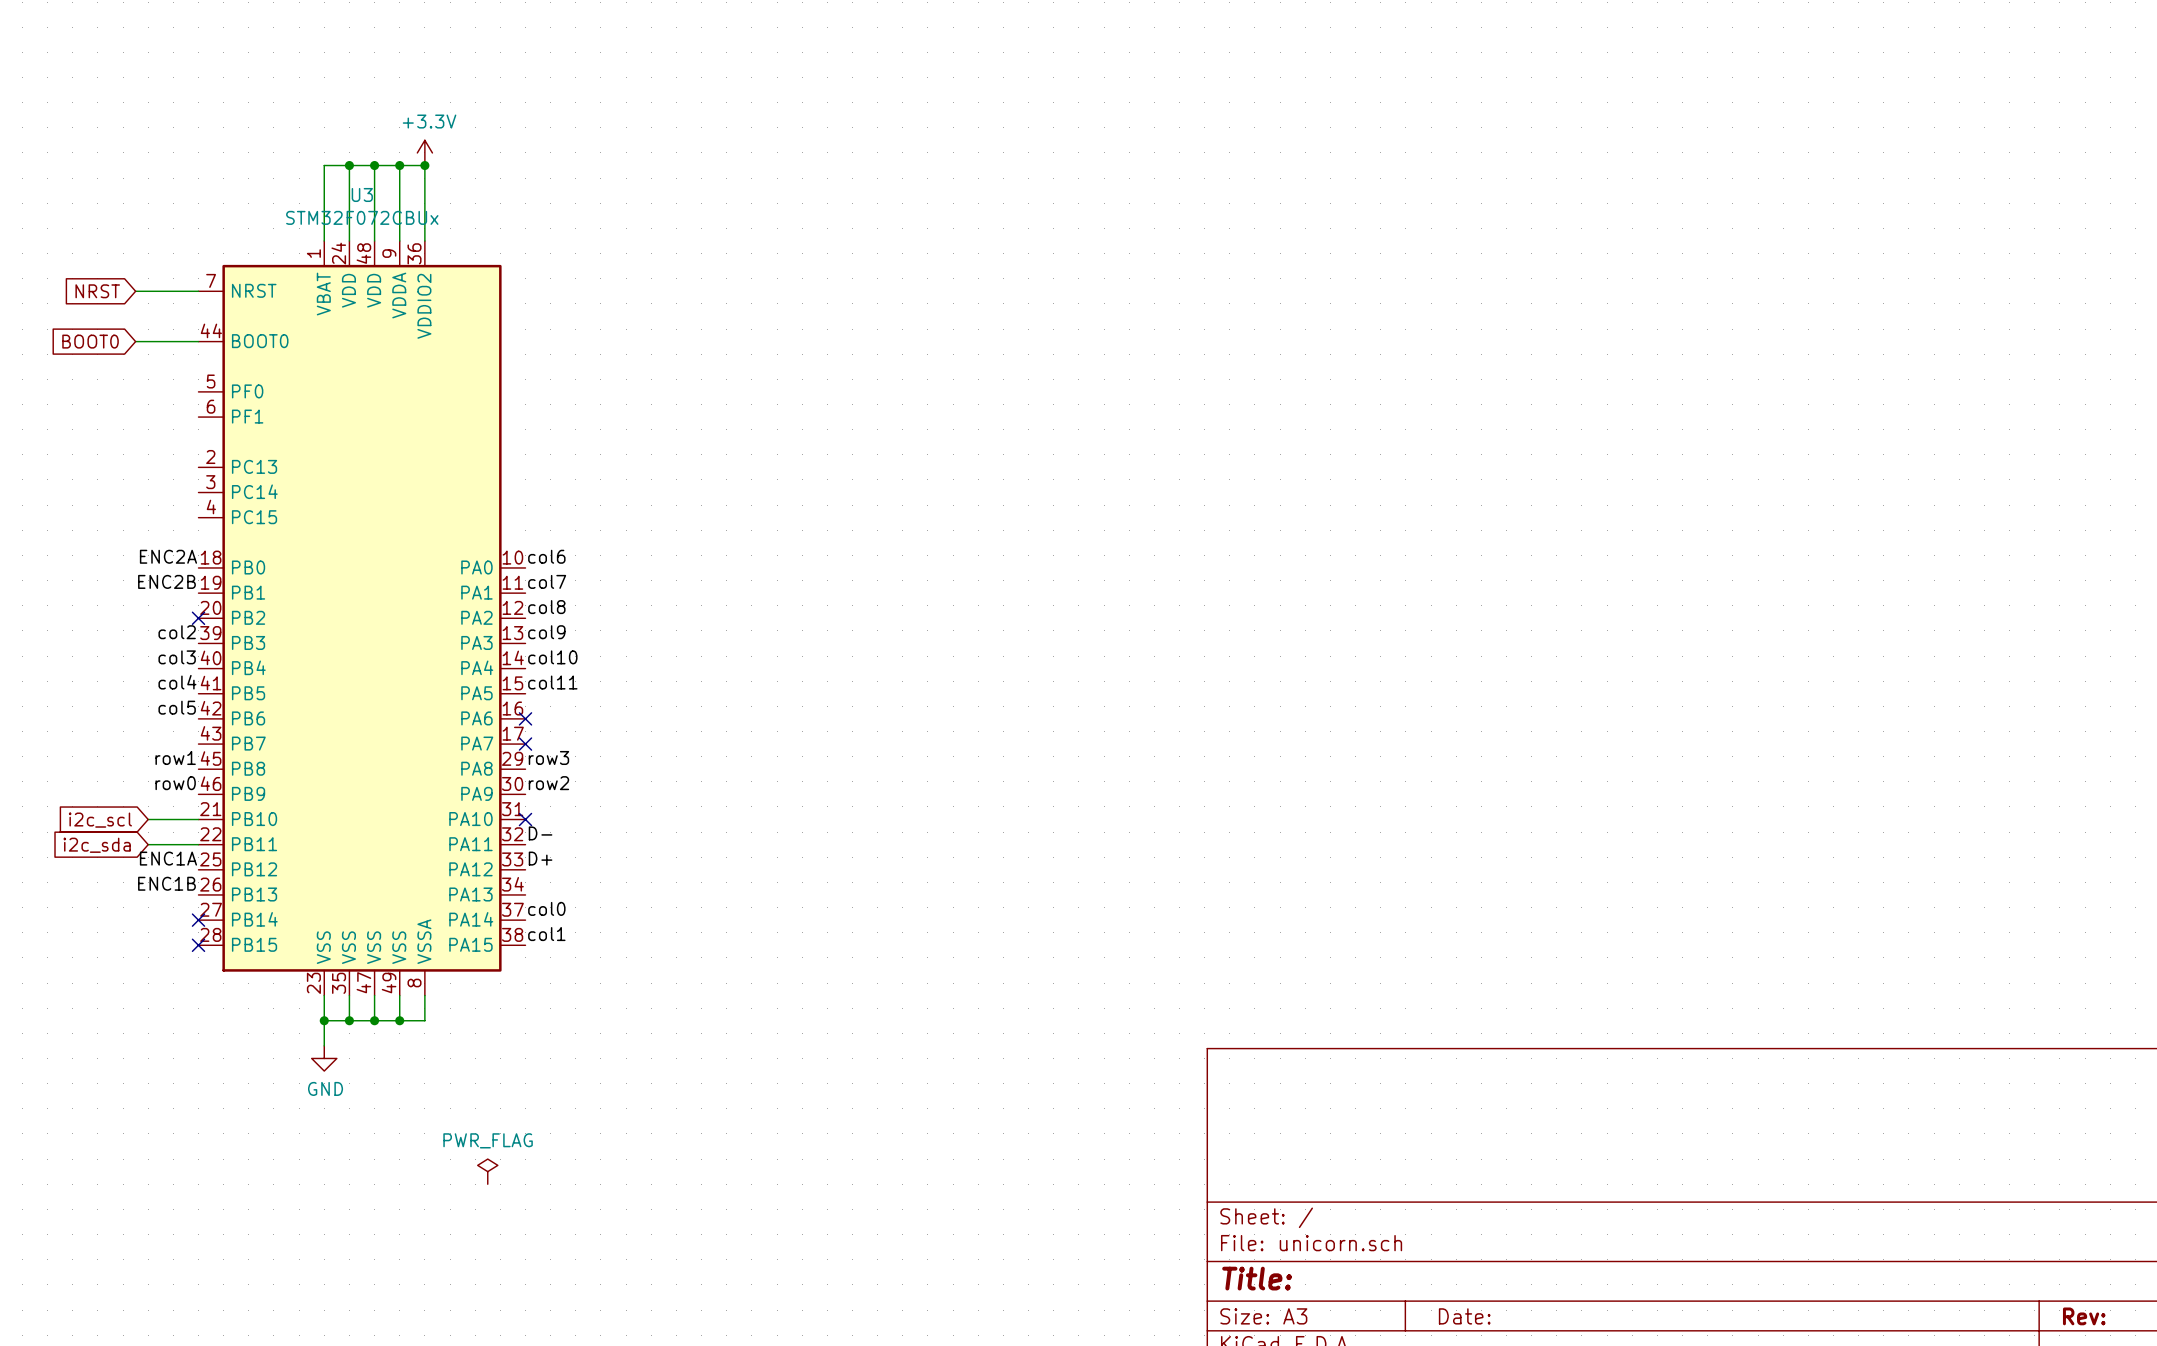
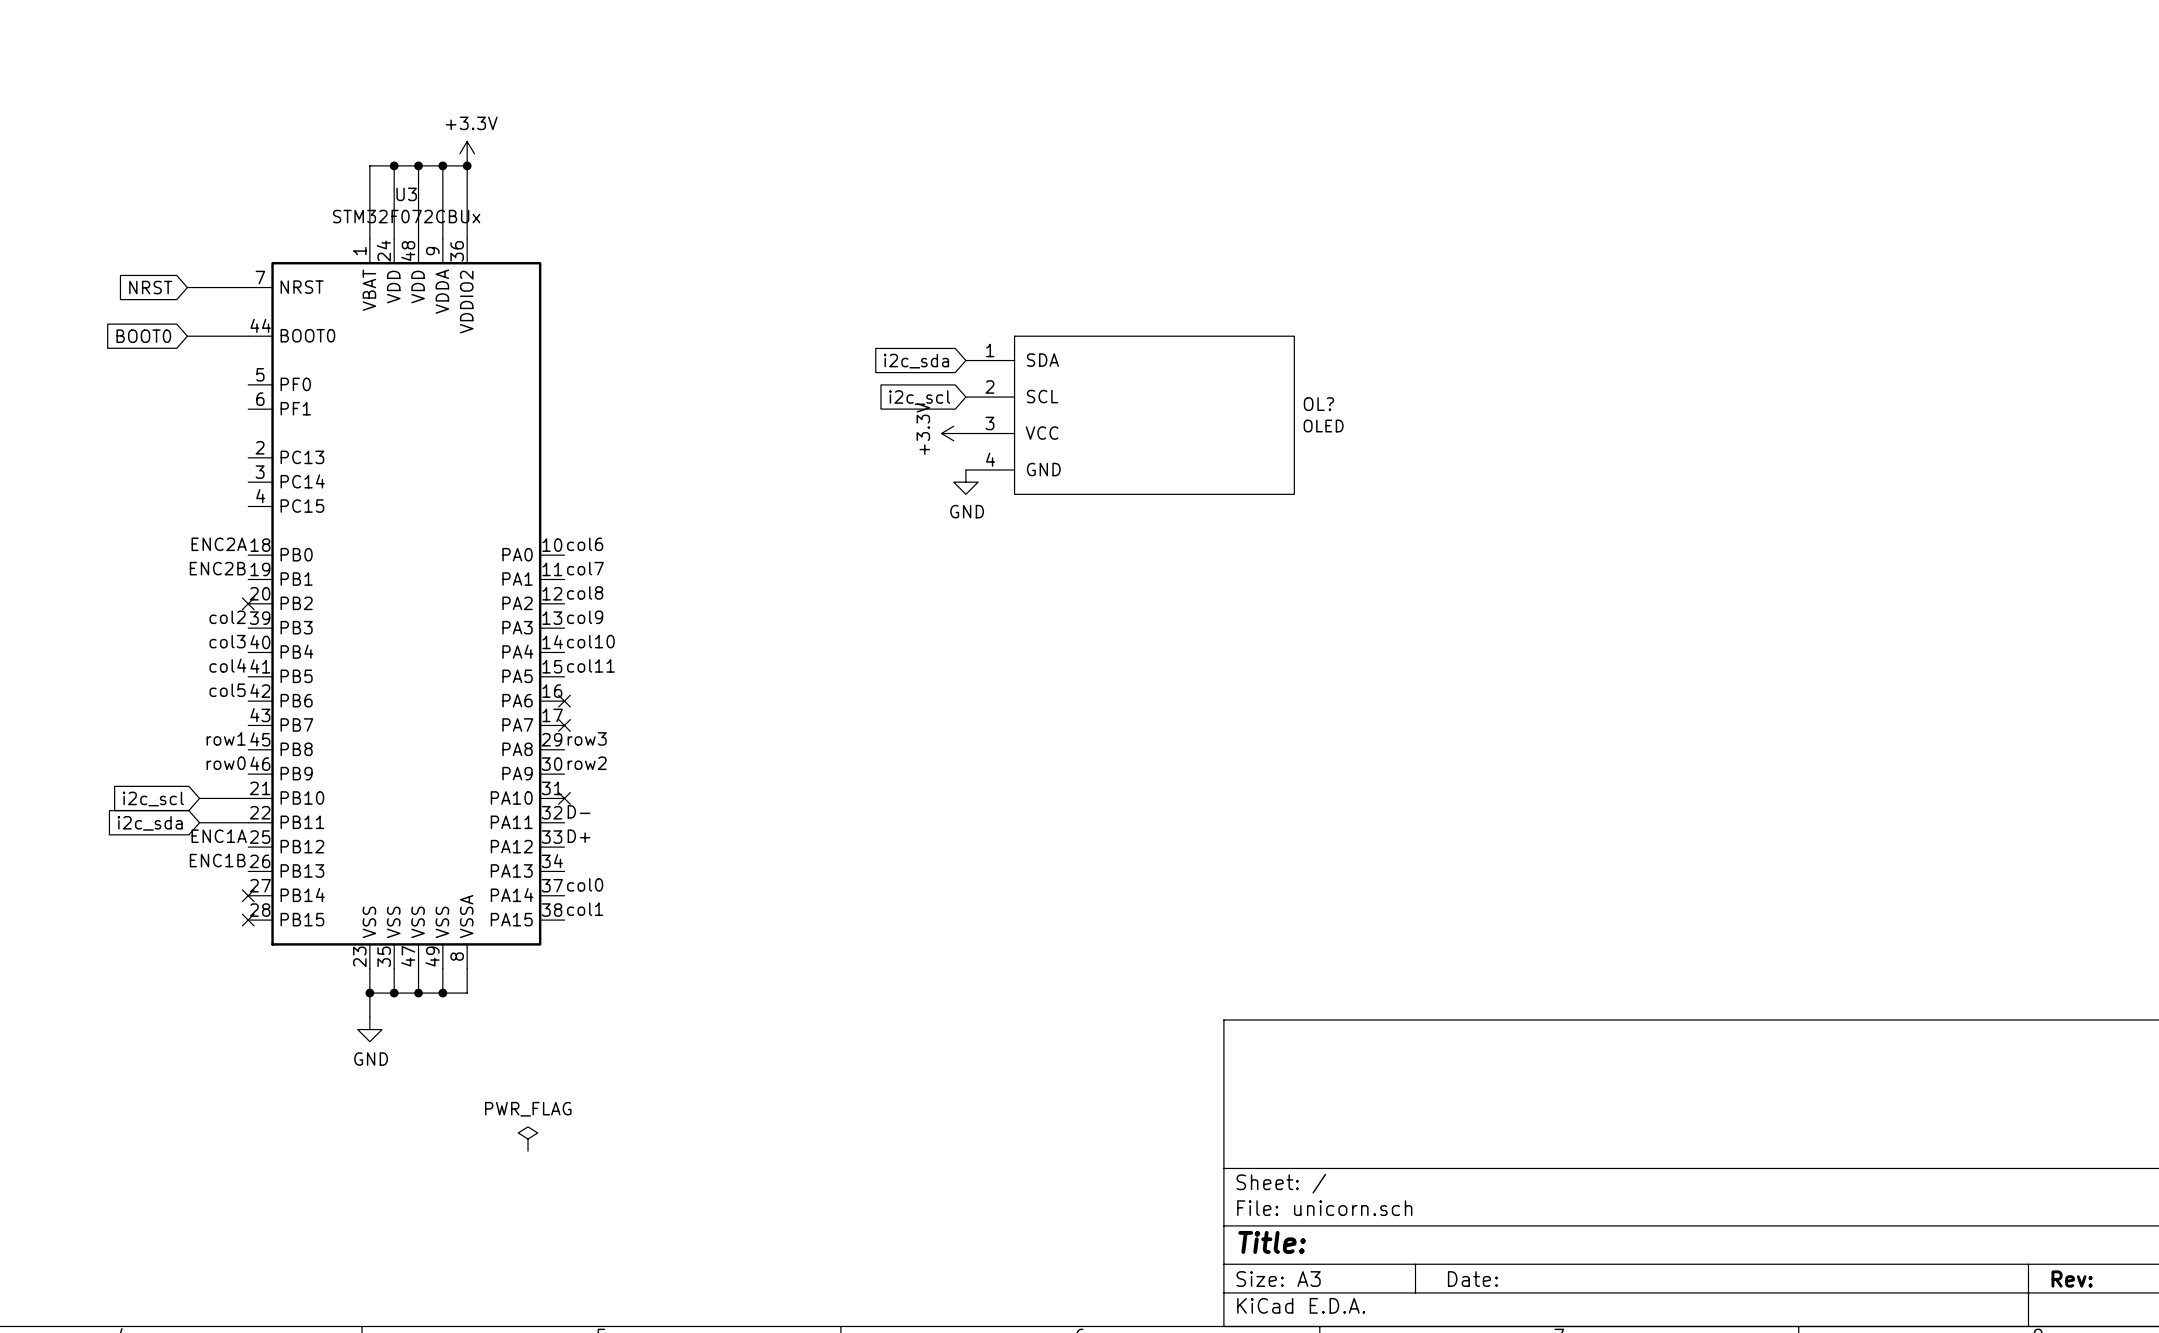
global label: none -> i2c_sda (916, 361)
global label: none -> i2c_scl (919, 397)
OL?: none -> OLED (1130, 415)
power symbol: none -> +3.3V (953, 433)
power symbol: none -> GND (965, 482)

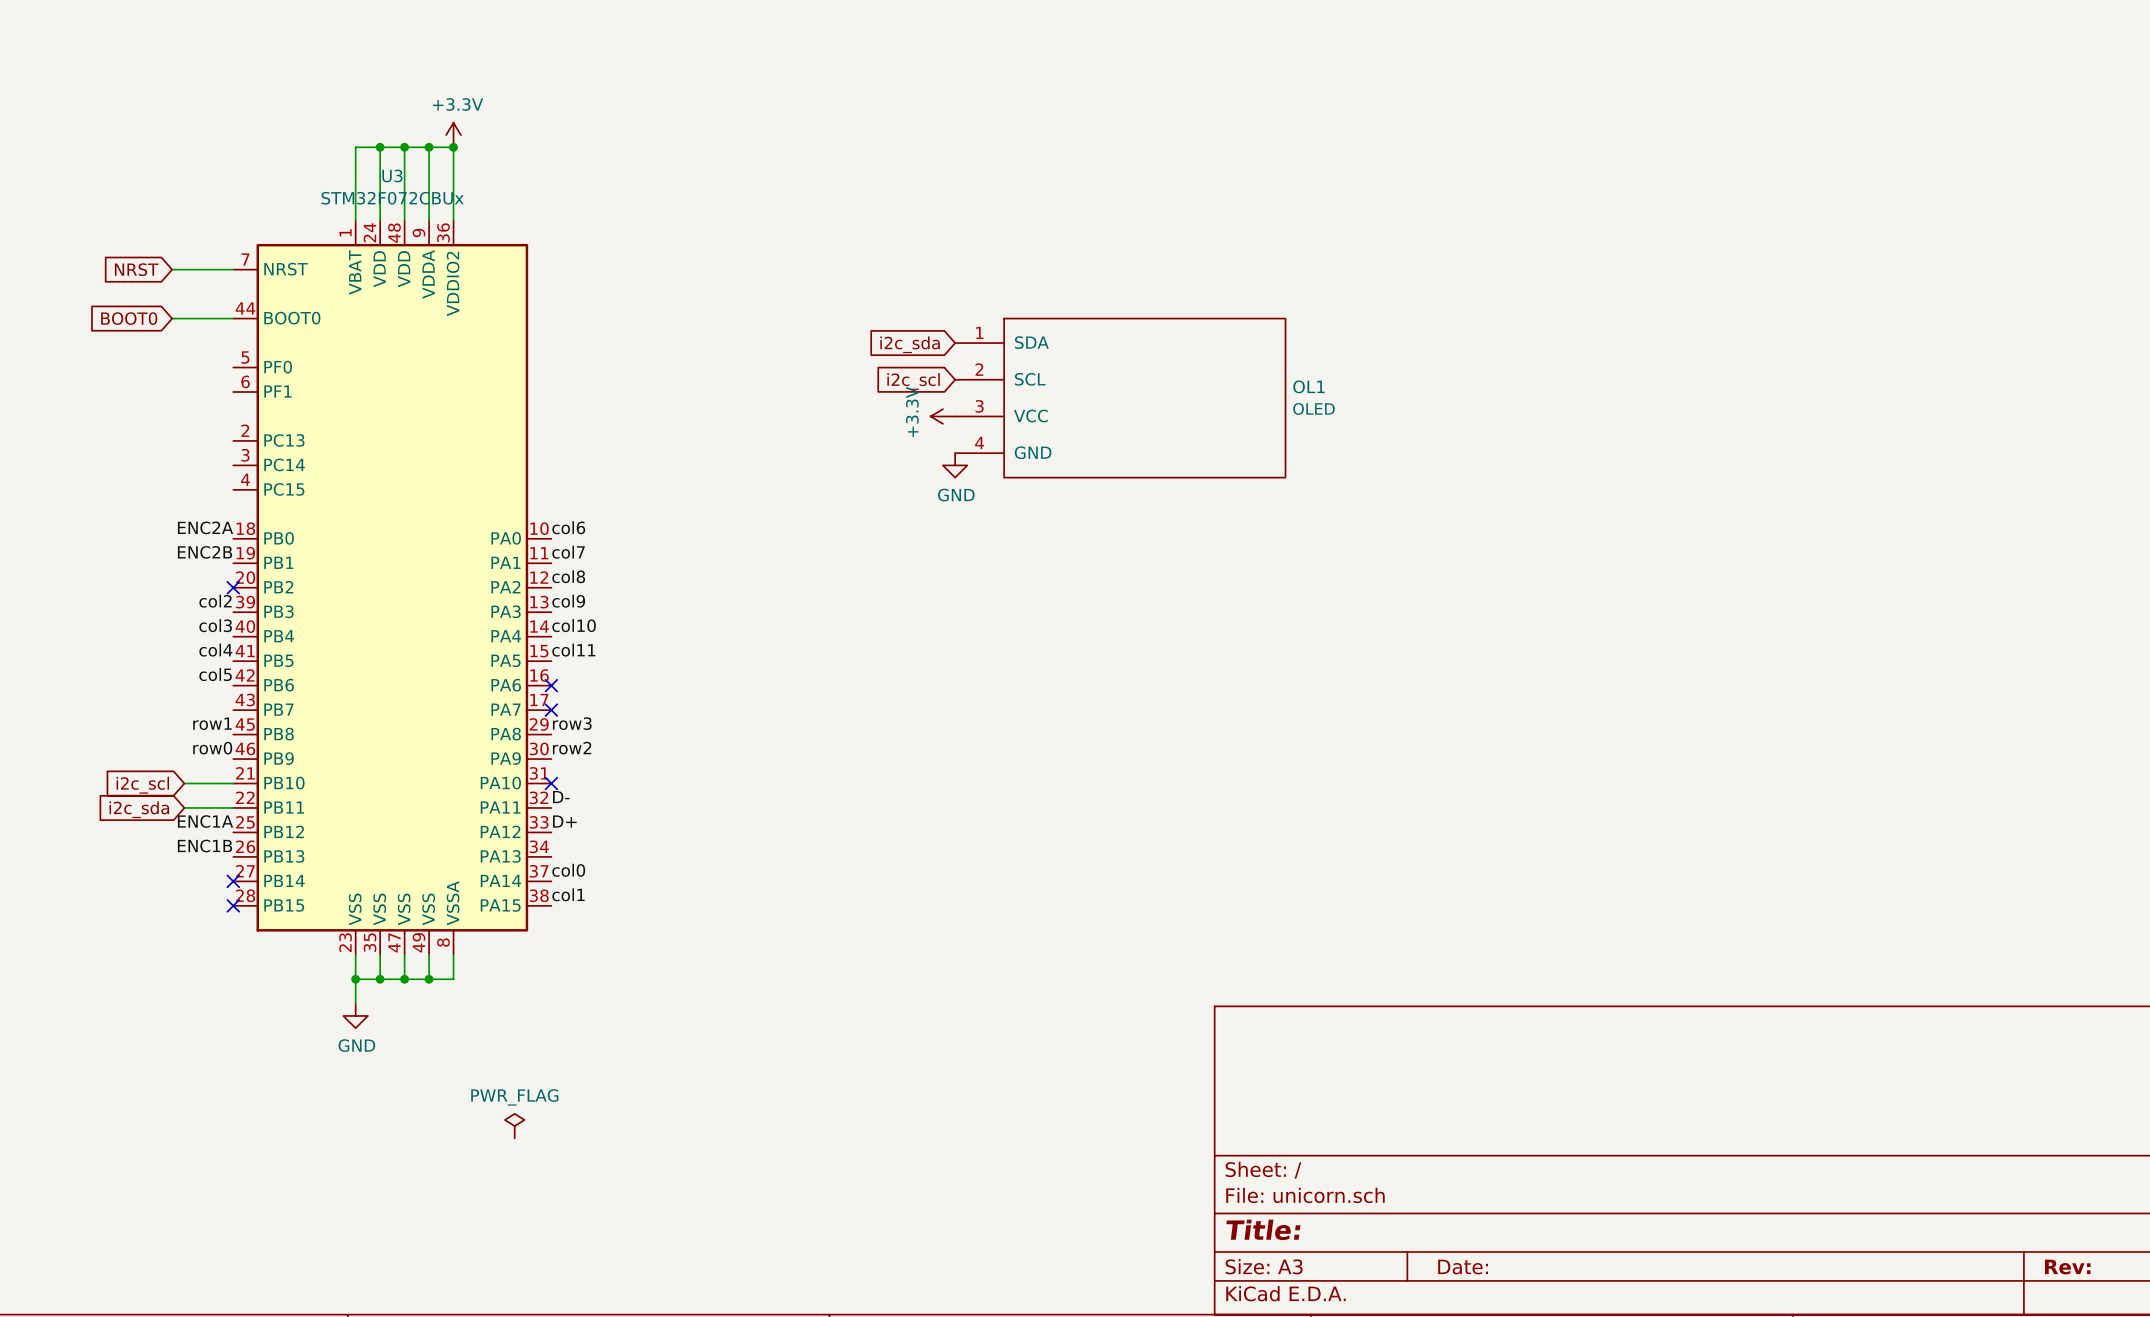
OL? name: OL? (1318, 404) -> OL1 (1308, 386)

